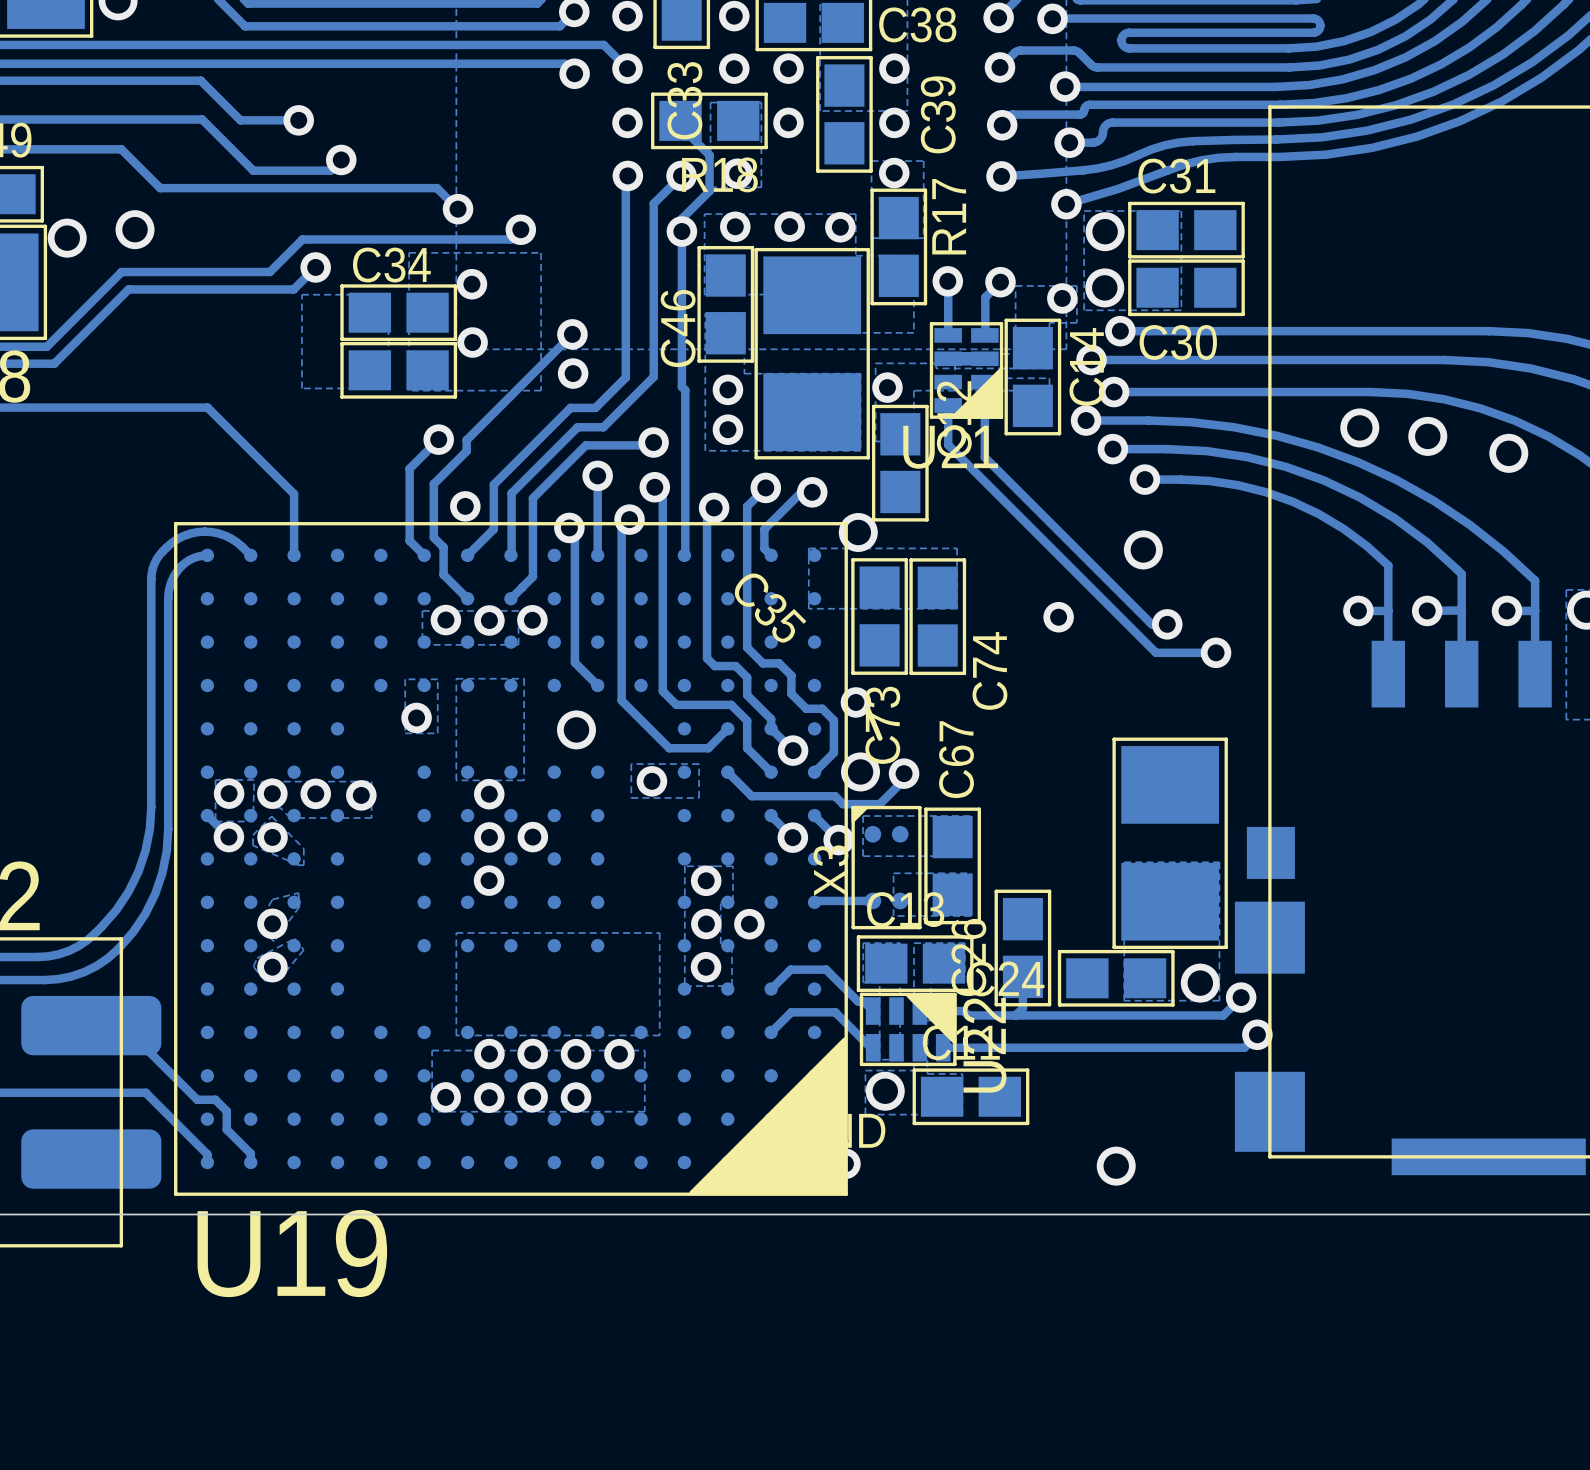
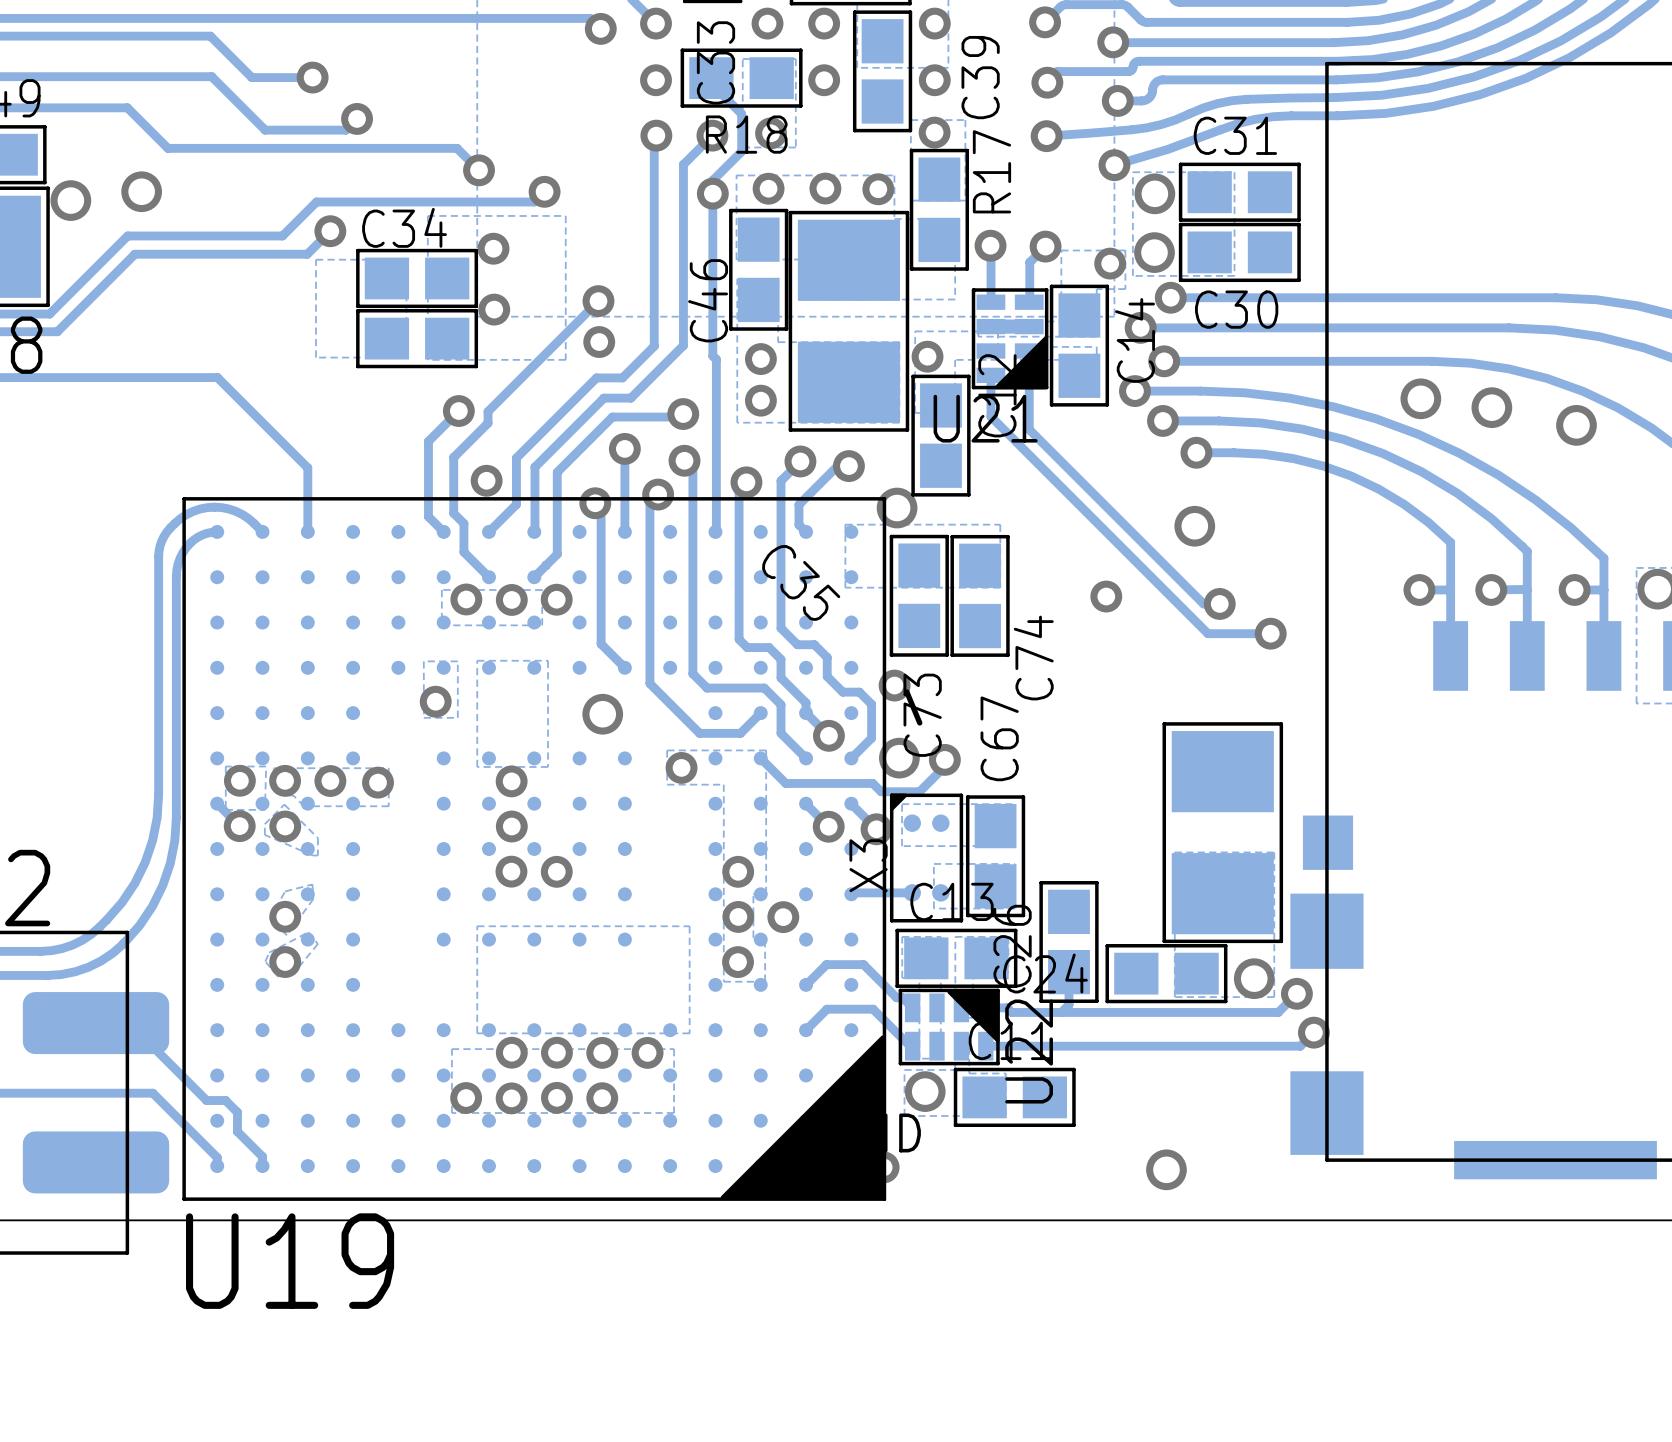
zone outline: (699, 764) (699, 797) (631, 797) (631, 764) (699, 764) -> none
via position: (532, 837) -> (556, 871)
zone outline: (732, 866) (684, 866) (684, 986) (692, 986) -> (766, 856) (766, 750) (667, 750) (667, 784) (723, 784) (723, 981)

